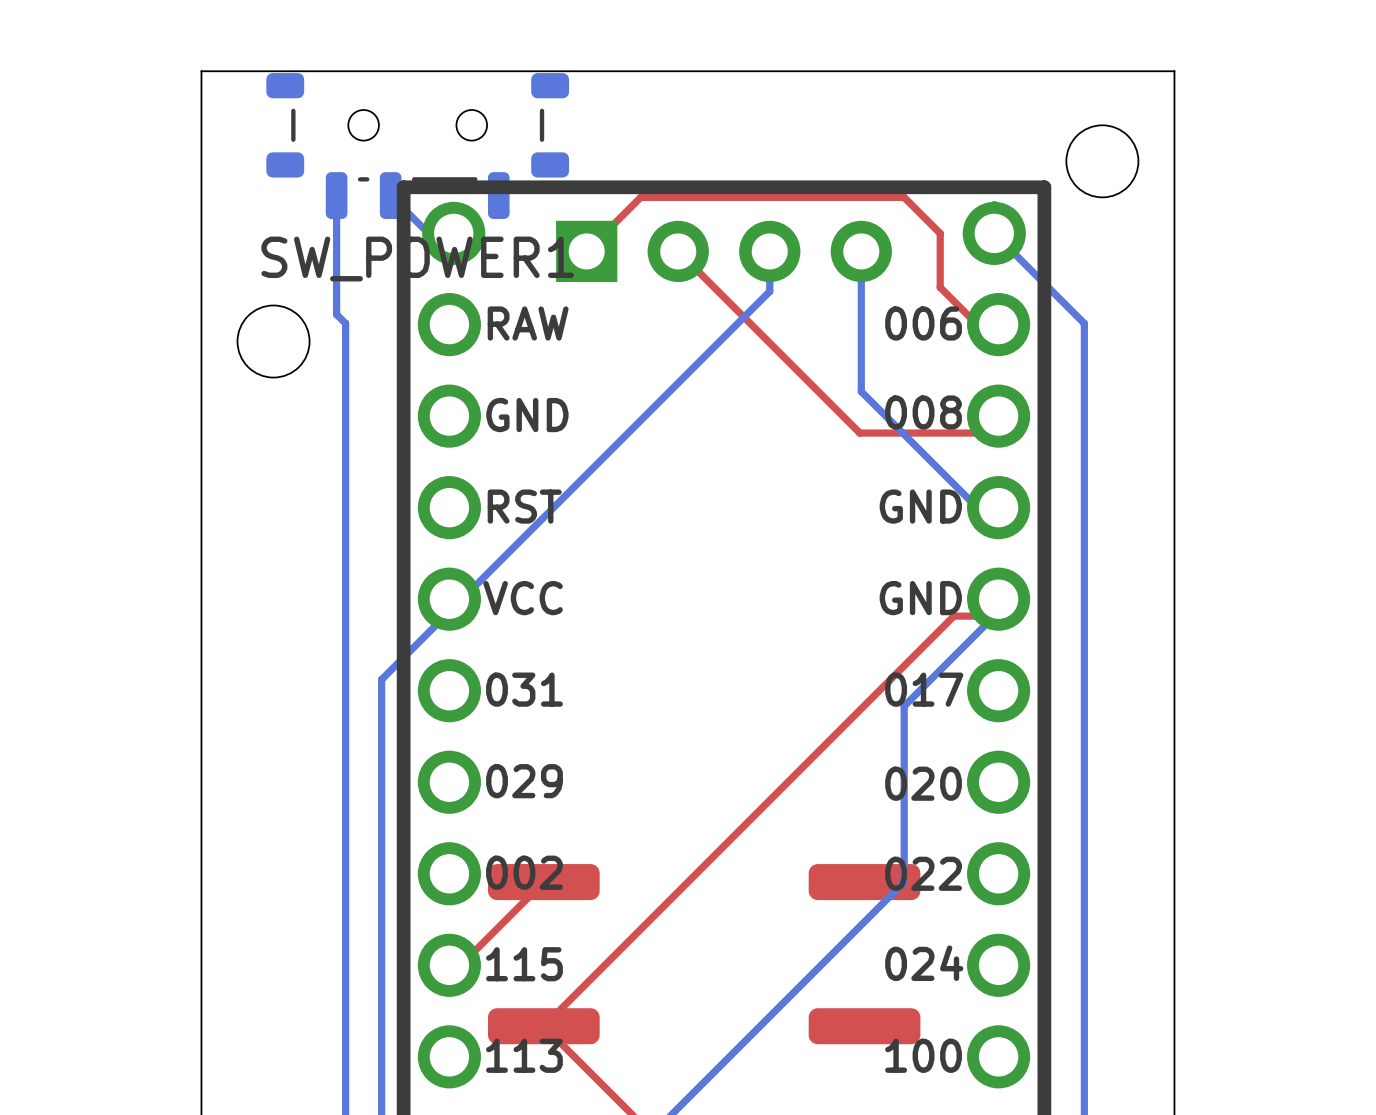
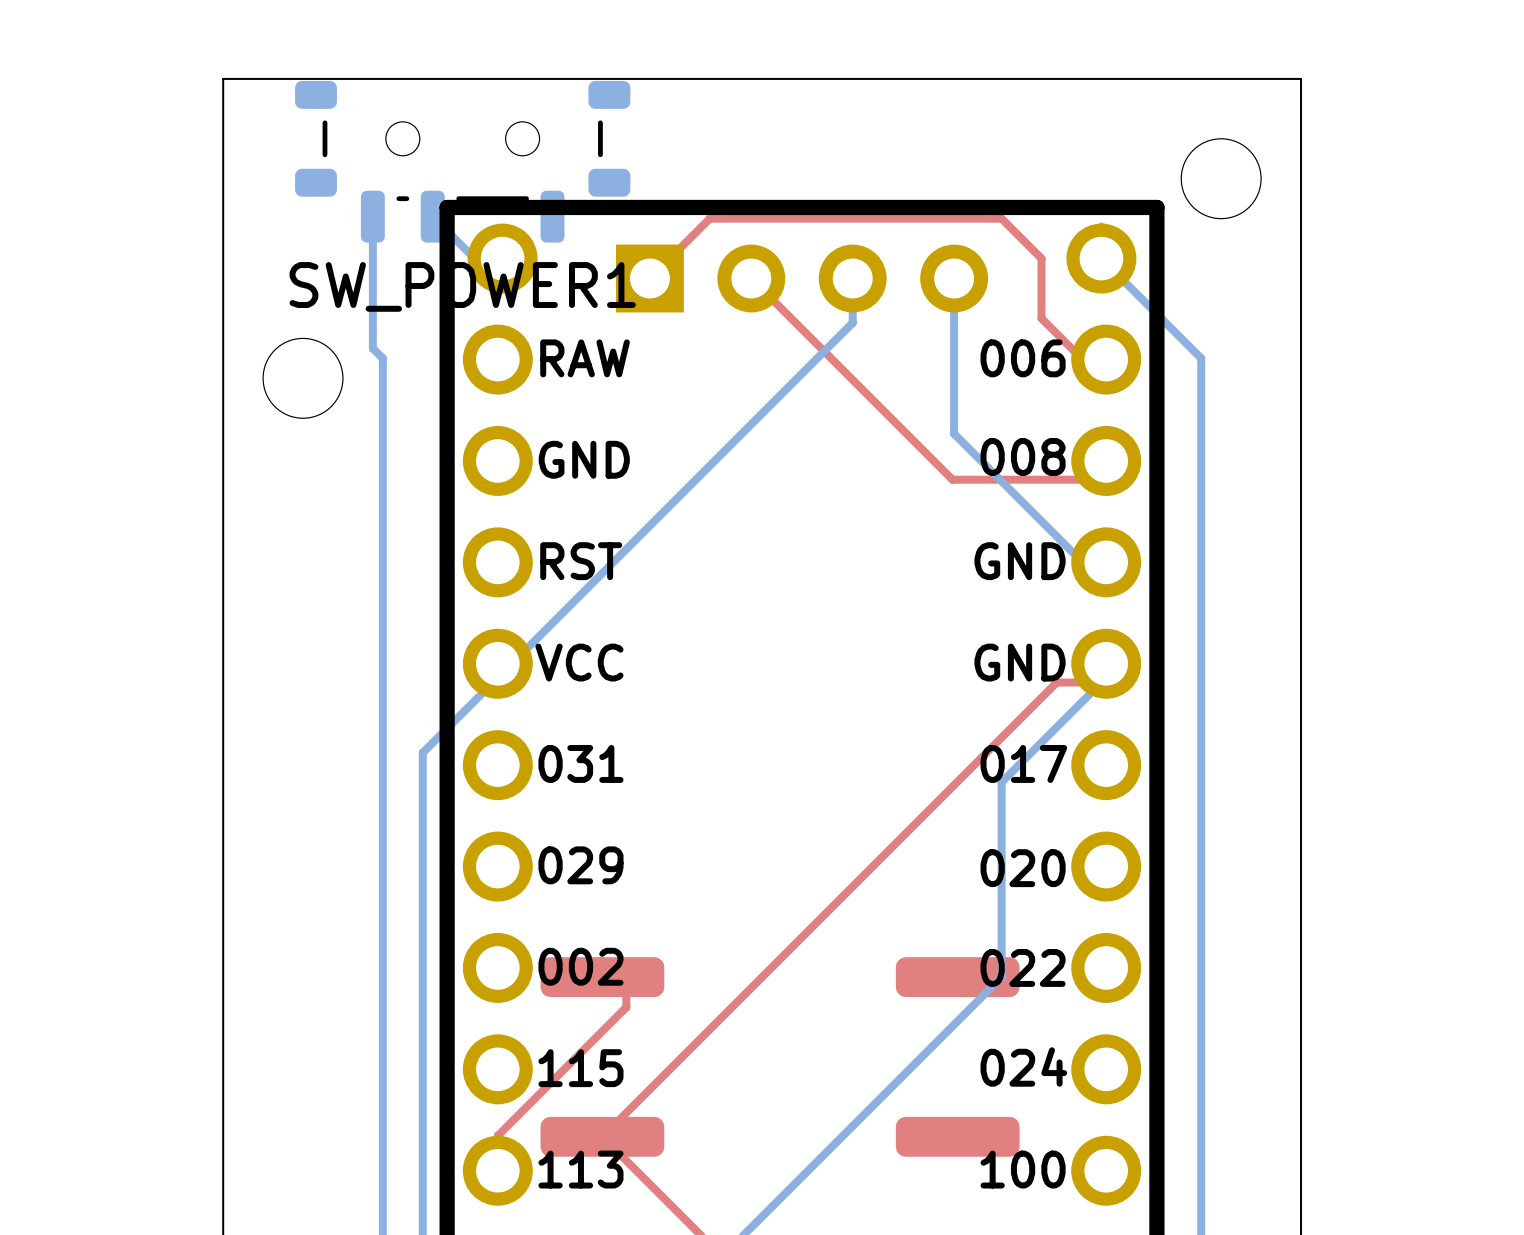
top track: (543, 882) (445, 980) -> none
top track: none -> (626, 977) (626, 1007) (497, 1135) (497, 1170)

